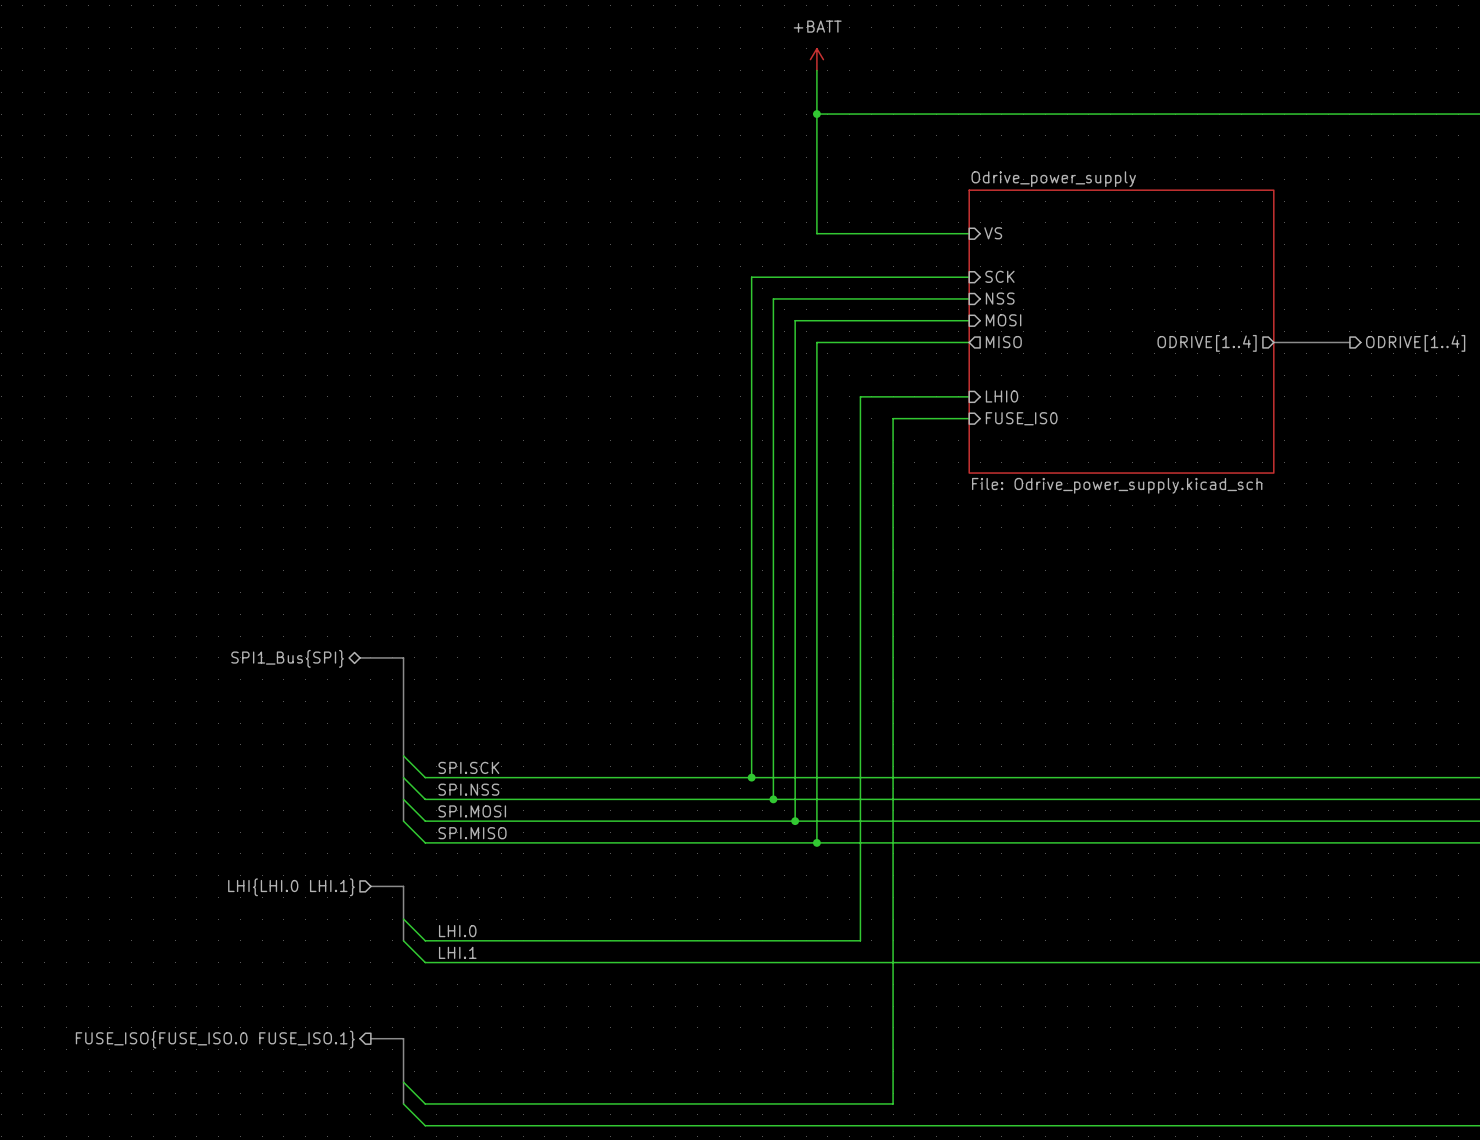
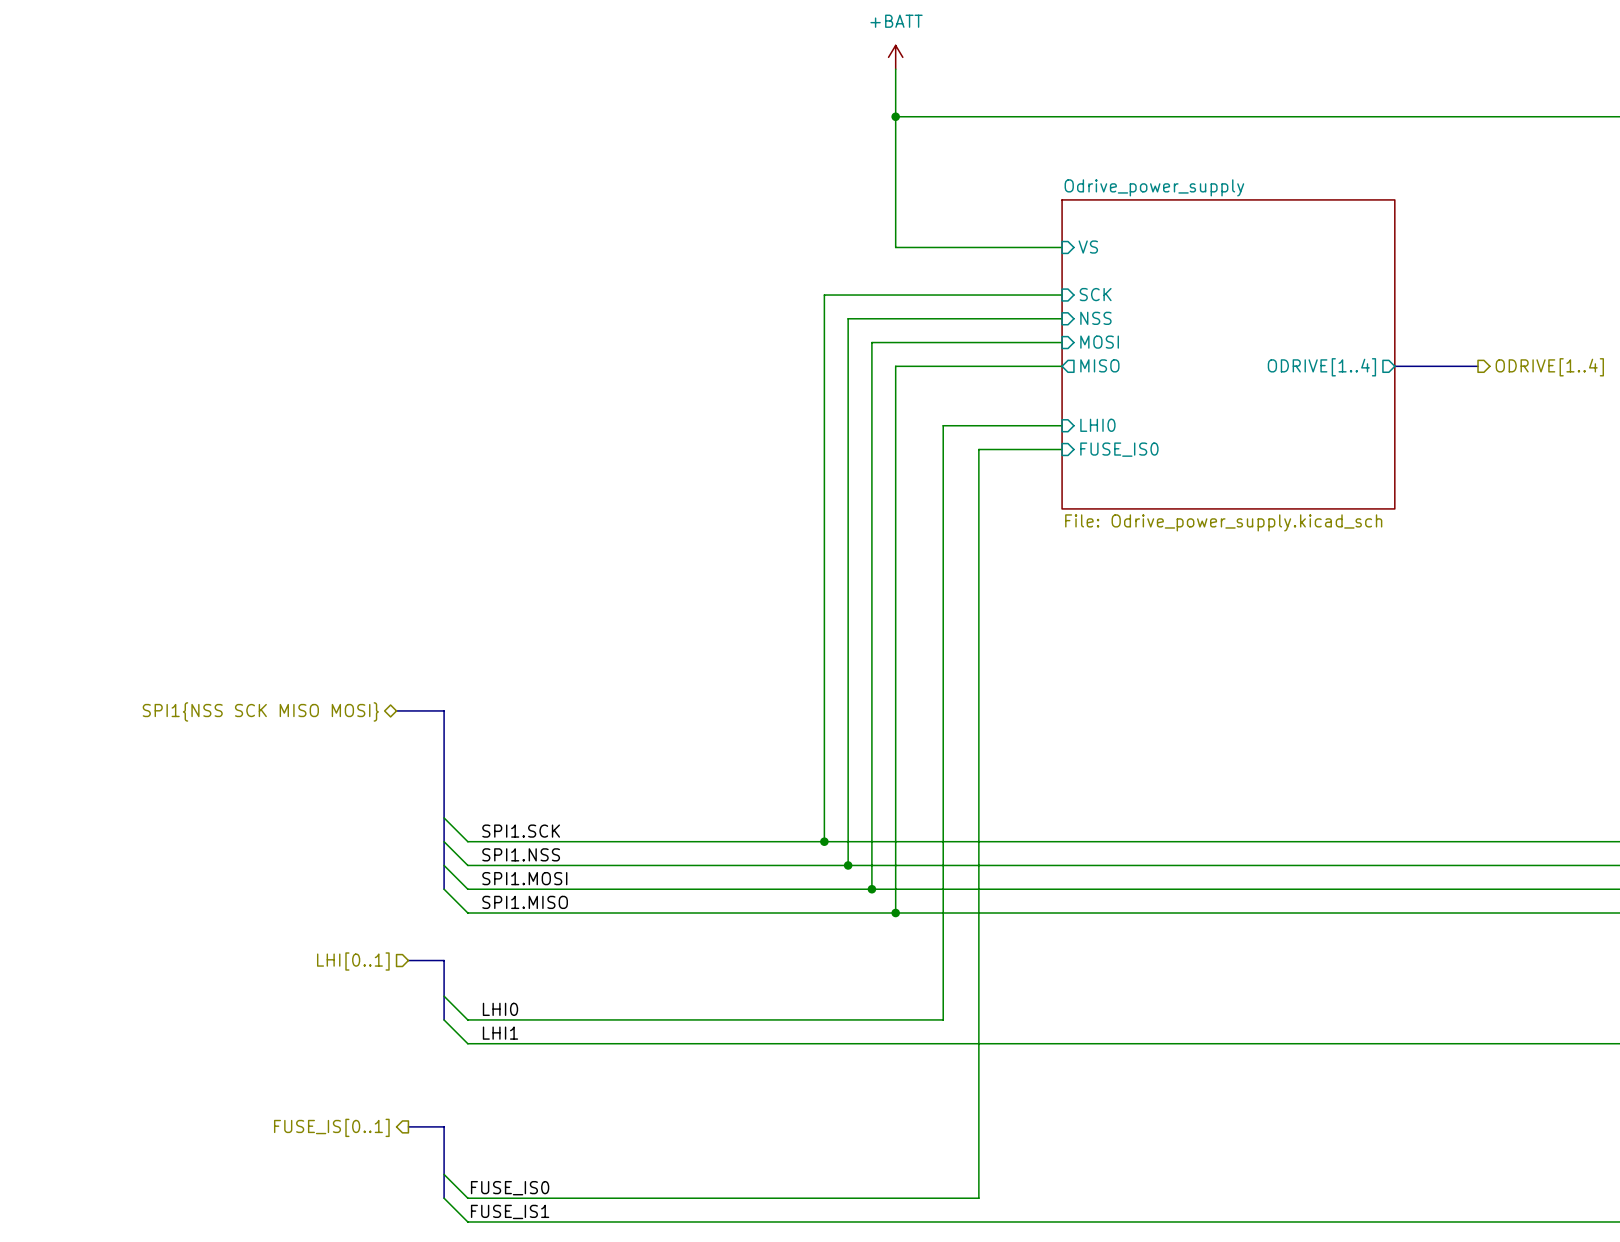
hierarchical label: SPI1_Bus{SPI} (287, 658) -> SPI1{NSS SCK MISO MOSI} (260, 711)
label: SPI.SCK (468, 767) -> SPI1.SCK (521, 831)
label: SPI.NSS (468, 789) -> SPI1.NSS (521, 854)
label: SPI.MOSI (472, 811) -> SPI1.MOSI (524, 878)
label: SPI.MISO (472, 833) -> SPI1.MISO (525, 902)
hierarchical label: LHI{LHI.0 LHI.1} (291, 887) -> LHI[0..1] (353, 961)
label: LHI.0 (457, 931) -> LHI0 (500, 1009)
label: LHI.1 (457, 952) -> LHI1 (500, 1033)
hierarchical label: FUSE_ISO{FUSE_ISO.0 FUSE_ISO.1} (215, 1039) -> FUSE_IS[0..1] (331, 1127)
label: none -> FUSE_IS0 (510, 1188)
label: none -> FUSE_IS1 (510, 1211)

